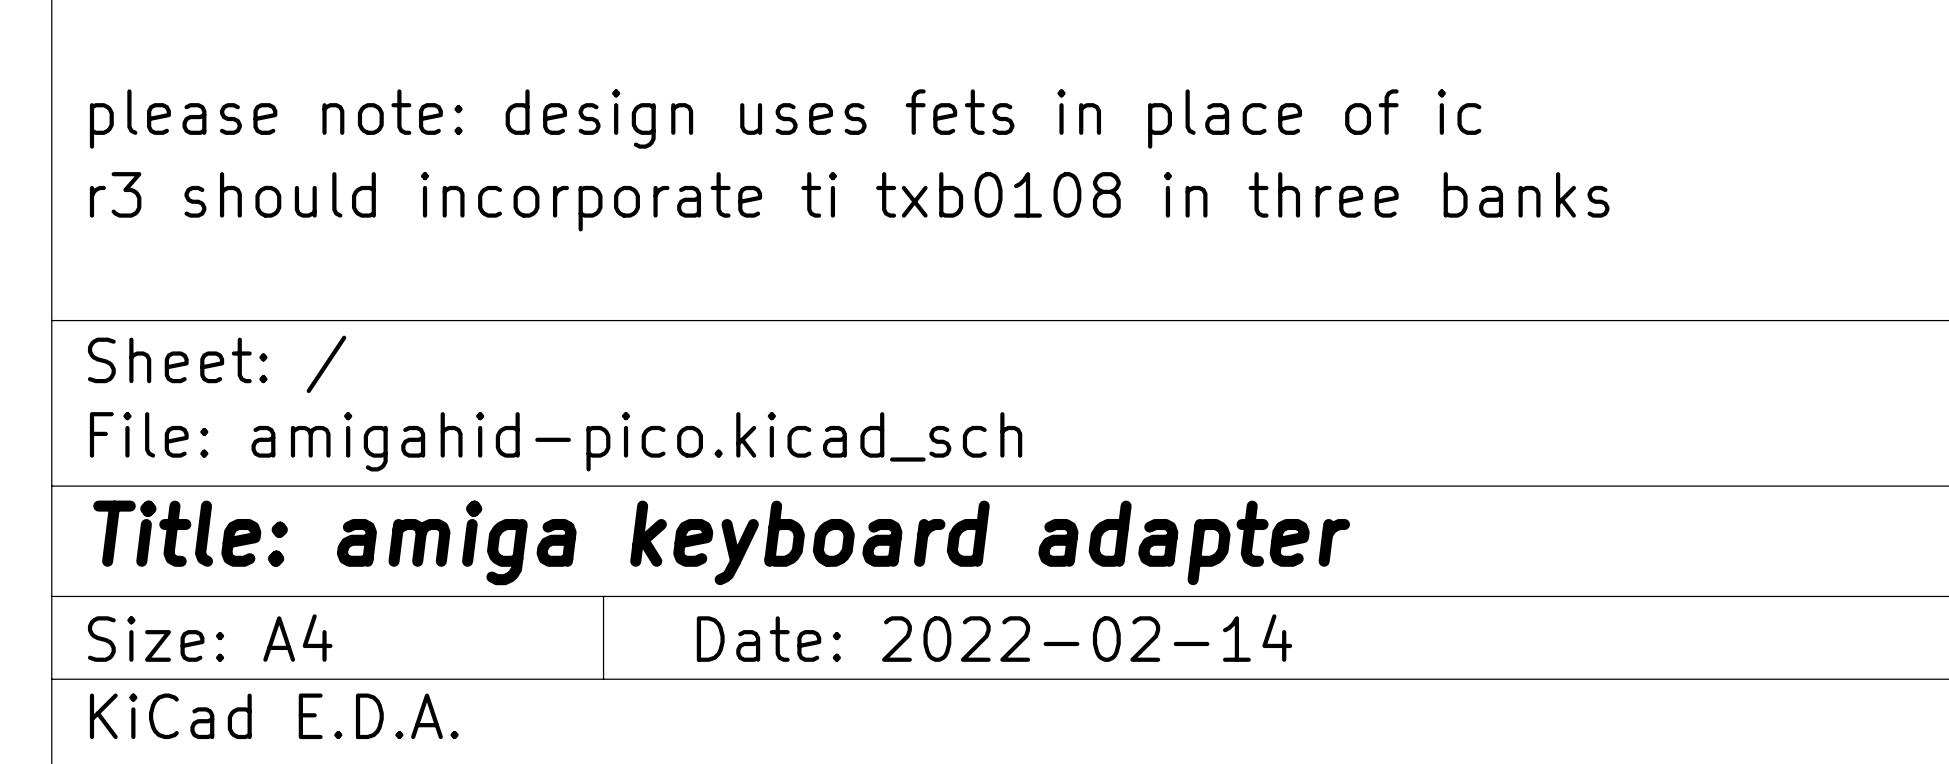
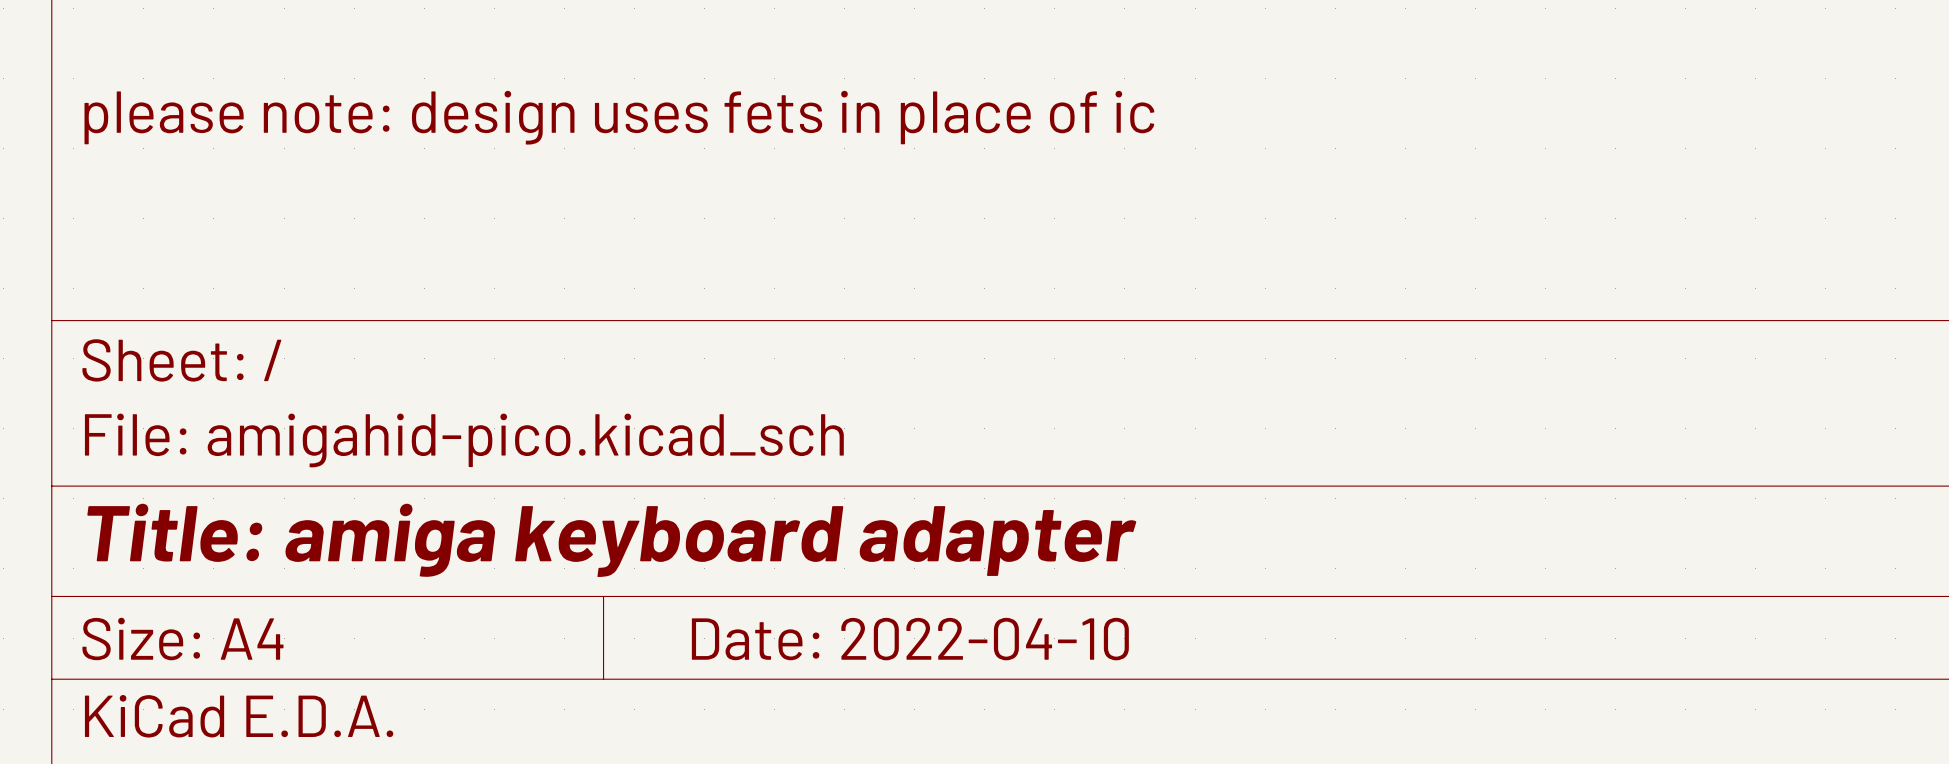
title block: r3 should incorporate ti txb0108 in three banks (849, 201) -> none
title block: Date: 2022-02-14 (994, 638) -> Date: 2022-04-10 (910, 639)

